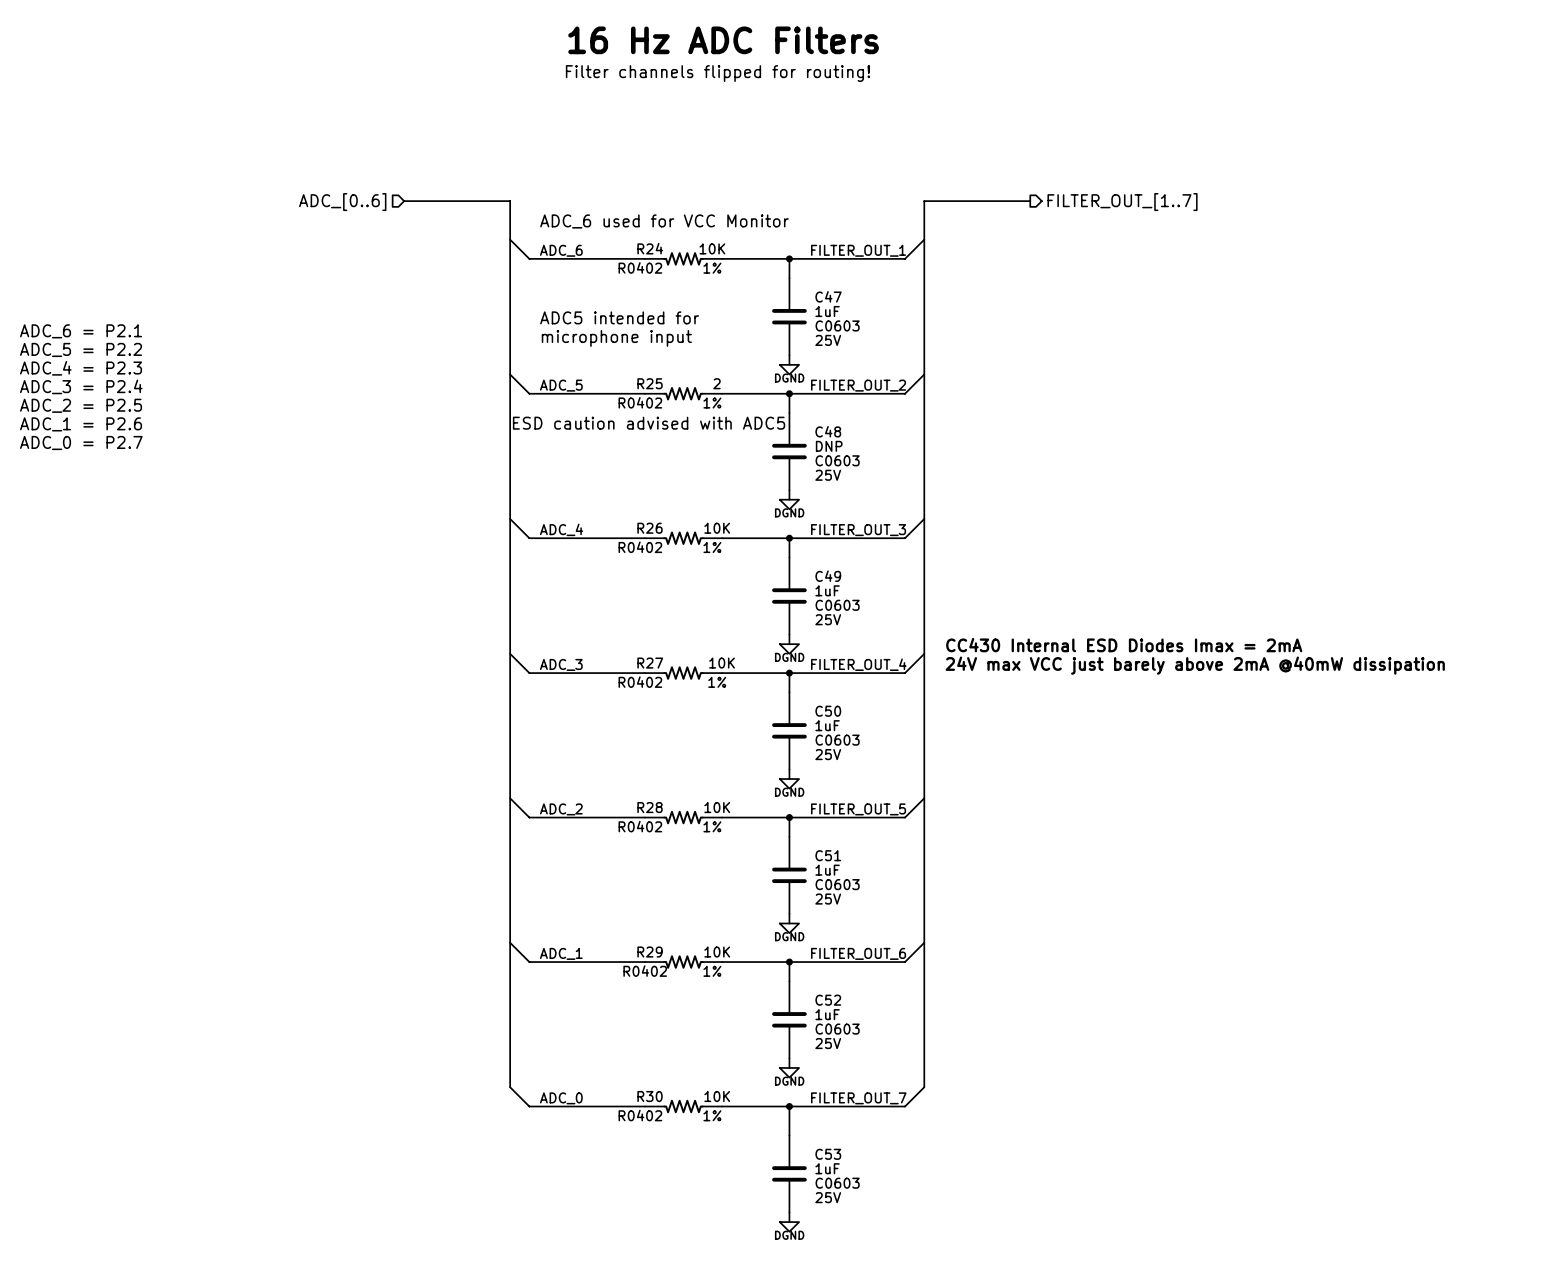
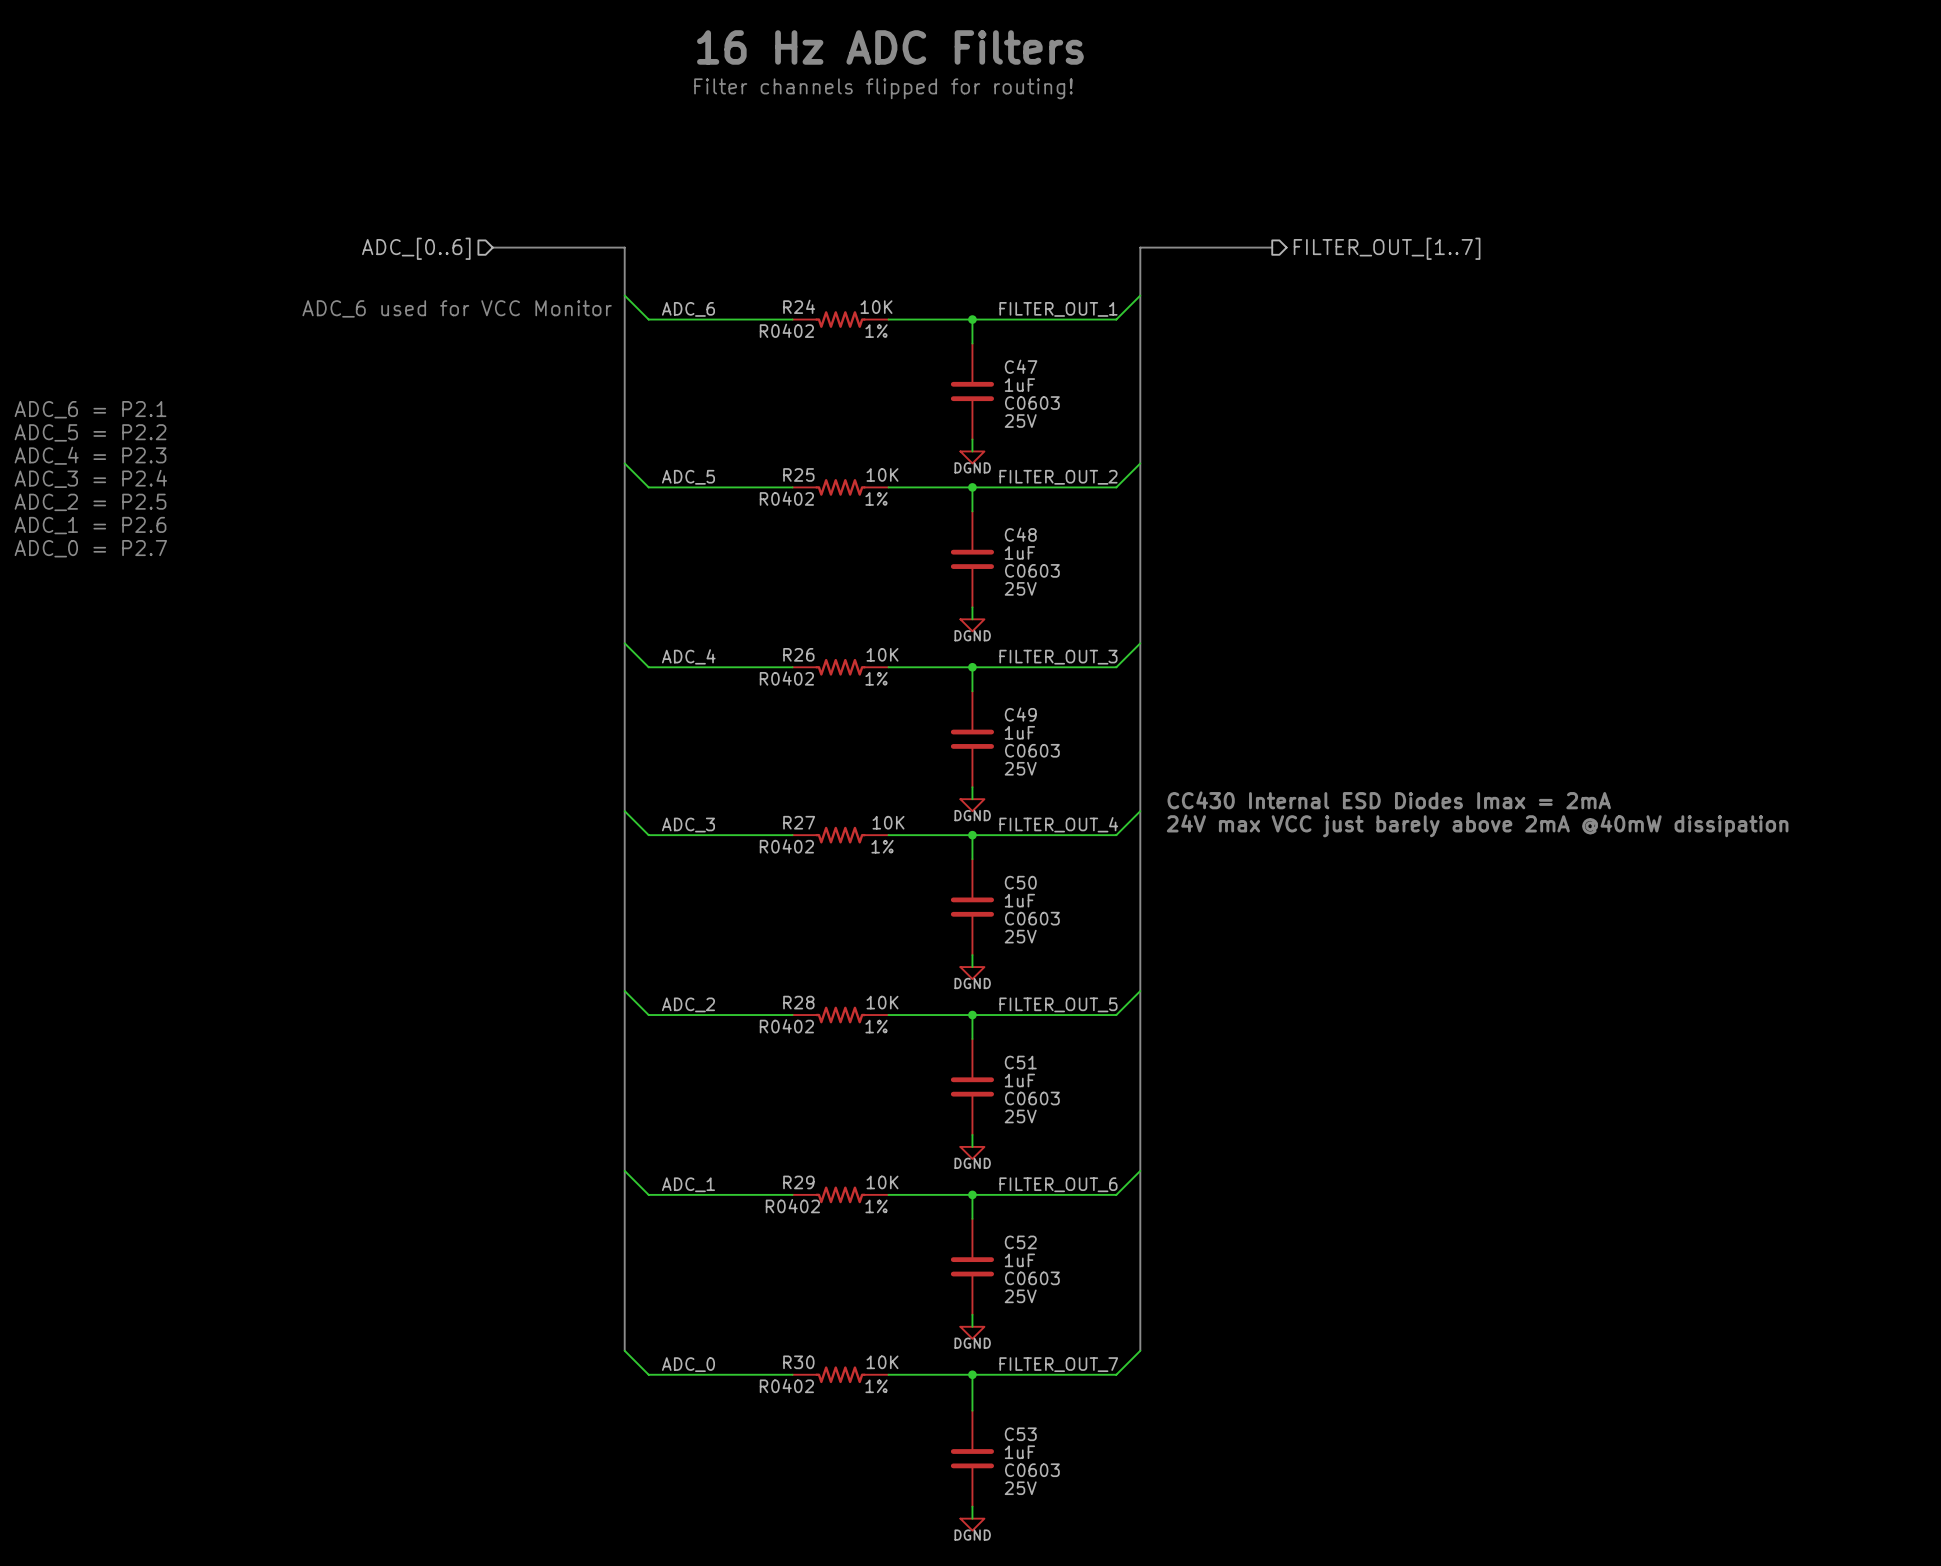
text: ADC_6 used for VCC Monitor (664, 221) -> none
text: none -> ADC_6 used for VCC Monitor (457, 308)
text: ADC5 intended for (619, 317) -> none
text: microphone input (616, 338) -> none
R25 value: 2 (716, 383) -> 10K (882, 474)
text: ESD caution advised with ADC5 (649, 423) -> none
C48 value: DNP (829, 446) -> 1uF (1019, 552)

